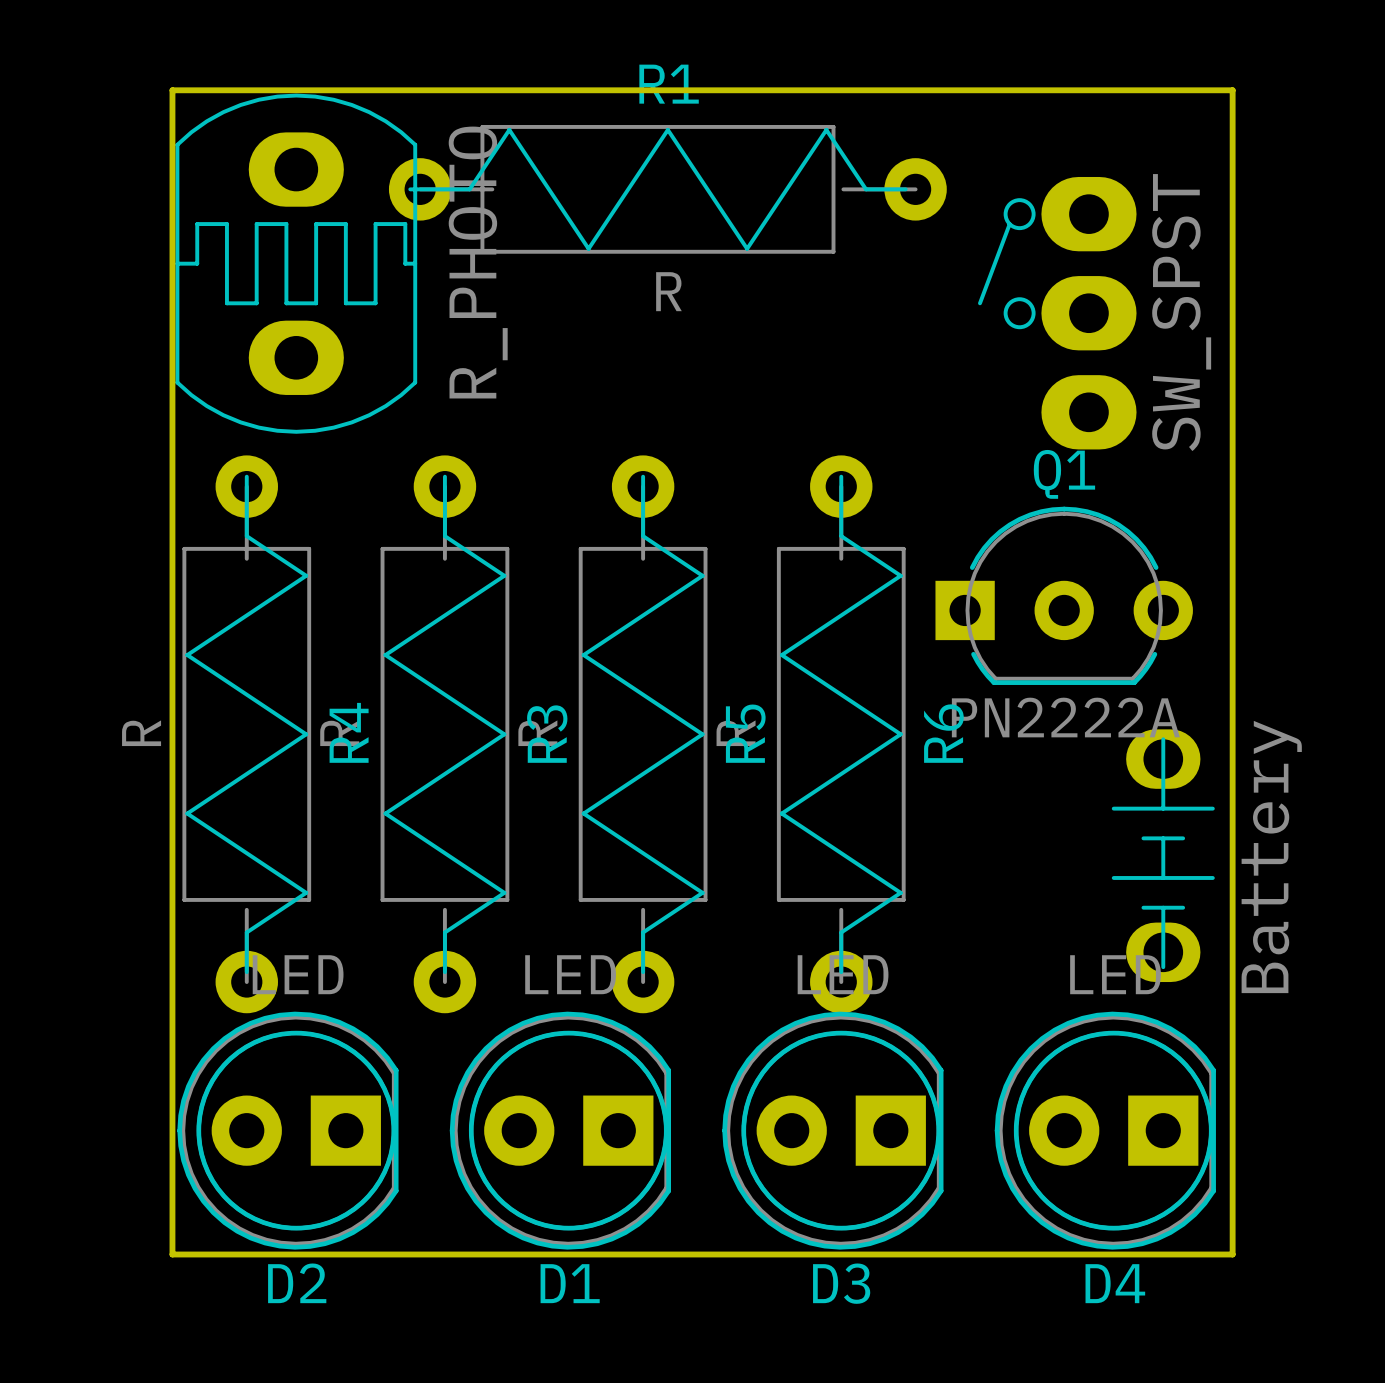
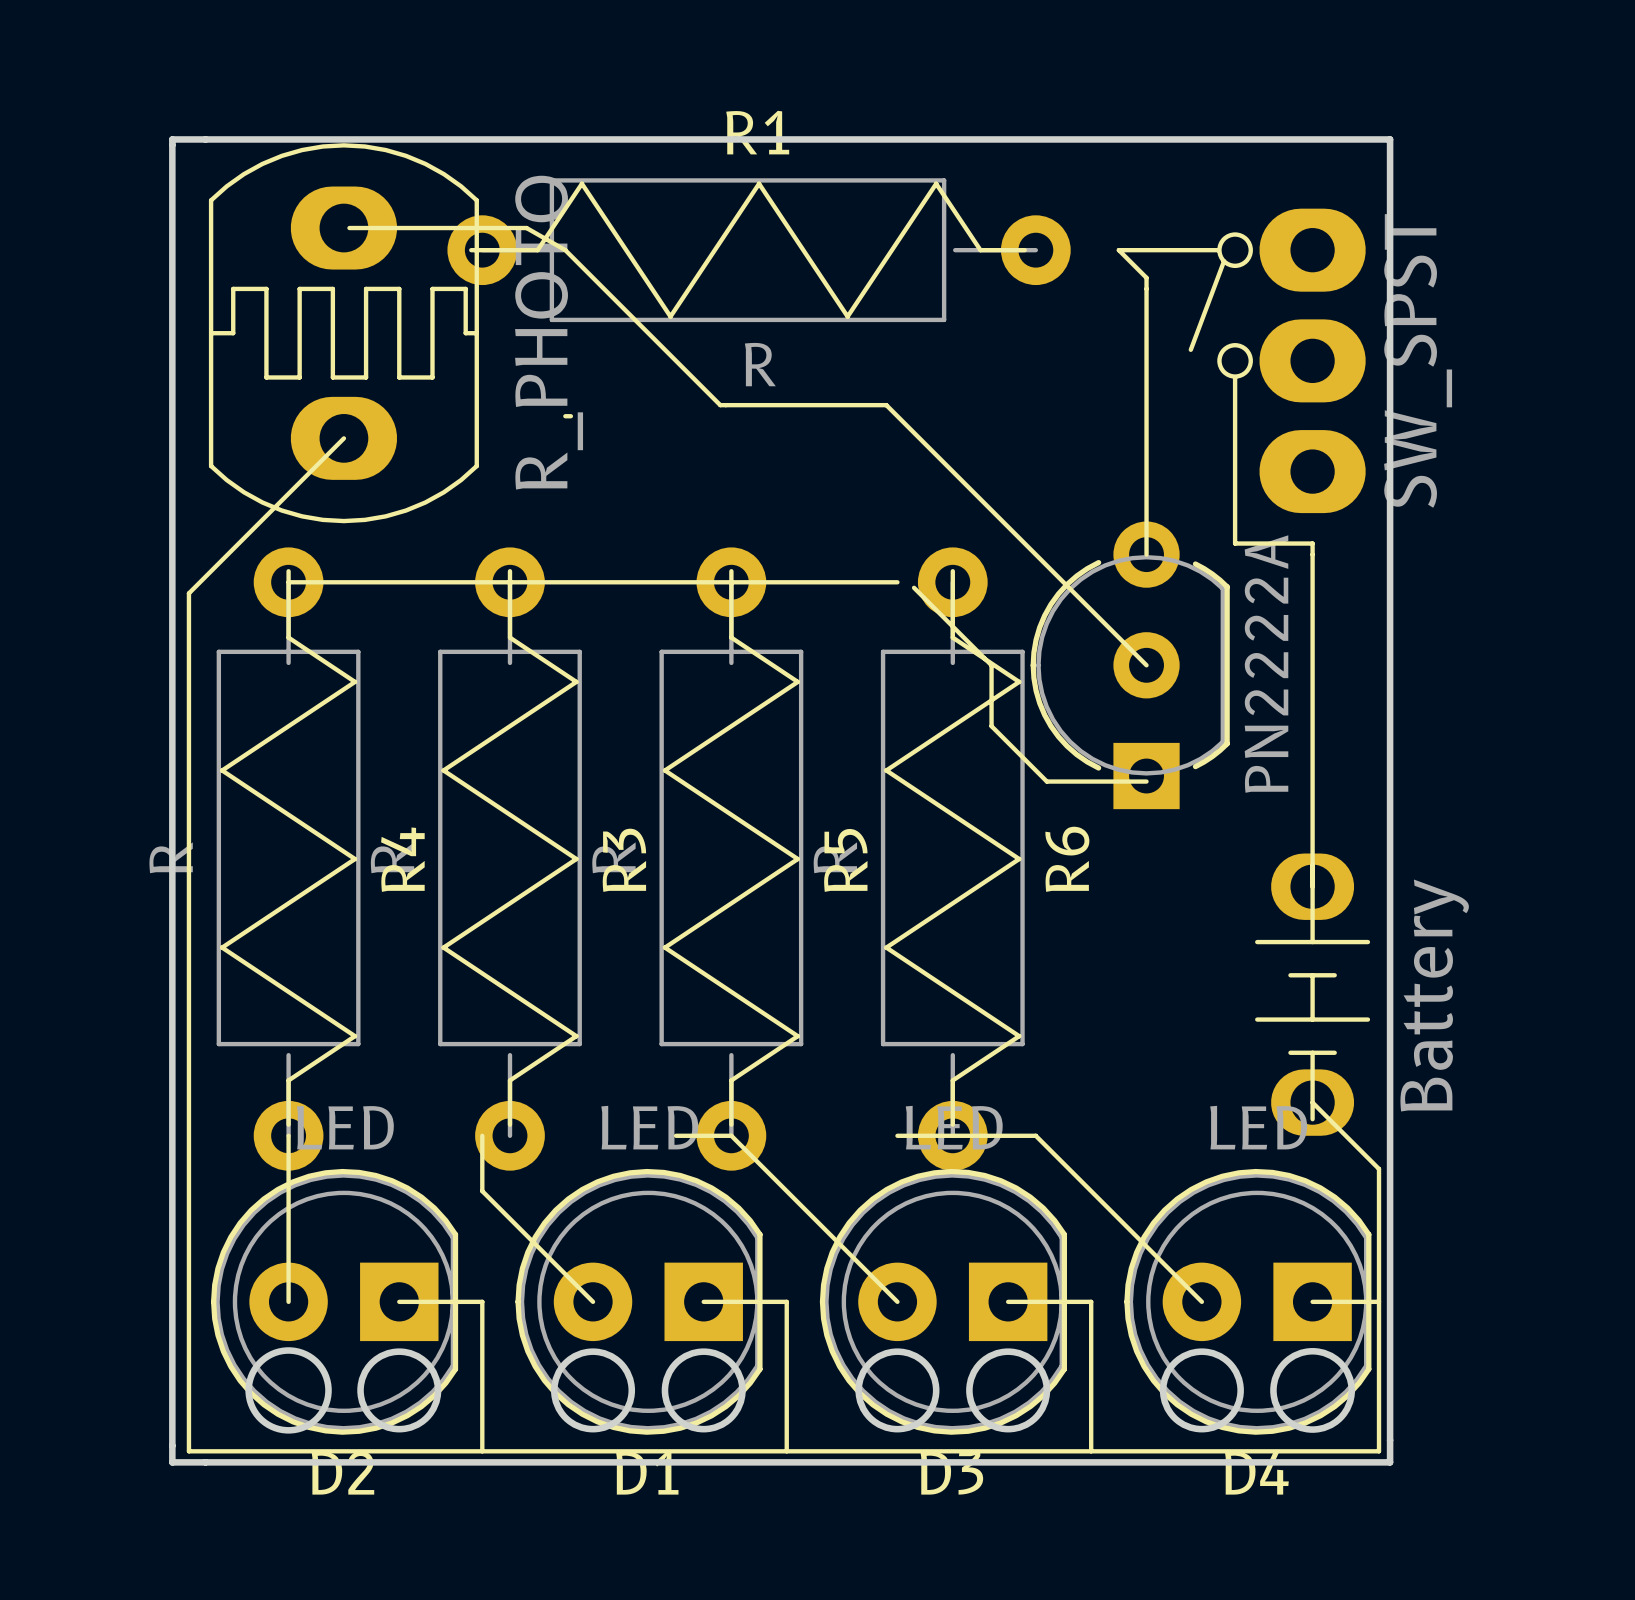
board edge: (172, 90) (172, 1254) (1232, 1254) -> (205, 139) (172, 139) (172, 1462) (1390, 1462) (1390, 1440)
line: none -> (349, 228) (526, 228) (565, 250) (720, 405) (886, 405) (1146, 665)
line: none -> (1218, 250) (1118, 250) (1146, 277) (1146, 554)
line: none -> (1235, 377) (1235, 543) (1312, 543) (1312, 886)
part position: (1057, 313) -> (1277, 360)
line: none -> (565, 416) (570, 416)
line: none -> (343, 438) (188, 593) (188, 1451) (1379, 1451) (1379, 1169) (1312, 1102)
line: none -> (288, 582) (897, 582)
line: none -> (914, 587) (991, 665) (991, 726) (1046, 781) (1146, 781)
part: none -> PN2222A (1130, 665)
Q1: PN2222A (1064, 595) -> none
line: none -> (288, 1135) (288, 1301)
line: none -> (482, 1135) (482, 1191) (593, 1301)
line: none -> (676, 1135) (731, 1135) (897, 1301)
line: none -> (897, 1135) (1035, 1135) (1201, 1301)
D2 footprint: [177, 1011, 399, 1250] -> [211, 1168, 459, 1435]
D1 footprint: [449, 1011, 671, 1250] -> [515, 1168, 763, 1435]
D3 footprint: [722, 1011, 944, 1250] -> [819, 1168, 1067, 1435]
D4 footprint: [994, 1011, 1216, 1250] -> [1124, 1168, 1372, 1435]
line: none -> (399, 1301) (482, 1301) (482, 1451)
line: none -> (703, 1301) (786, 1301) (786, 1451)
line: none -> (1008, 1301) (1091, 1301) (1091, 1451)
line: none -> (1312, 1301) (1379, 1301)
round board edge: none -> [245, 1347, 332, 1434]
round board edge: none -> [1270, 1348, 1356, 1433]
round board edge: none -> [357, 1348, 442, 1433]
round board edge: none -> [551, 1348, 636, 1433]
round board edge: none -> [661, 1348, 746, 1433]
round board edge: none -> [855, 1348, 940, 1433]
round board edge: none -> [966, 1348, 1051, 1433]
round board edge: none -> [1159, 1348, 1244, 1433]

